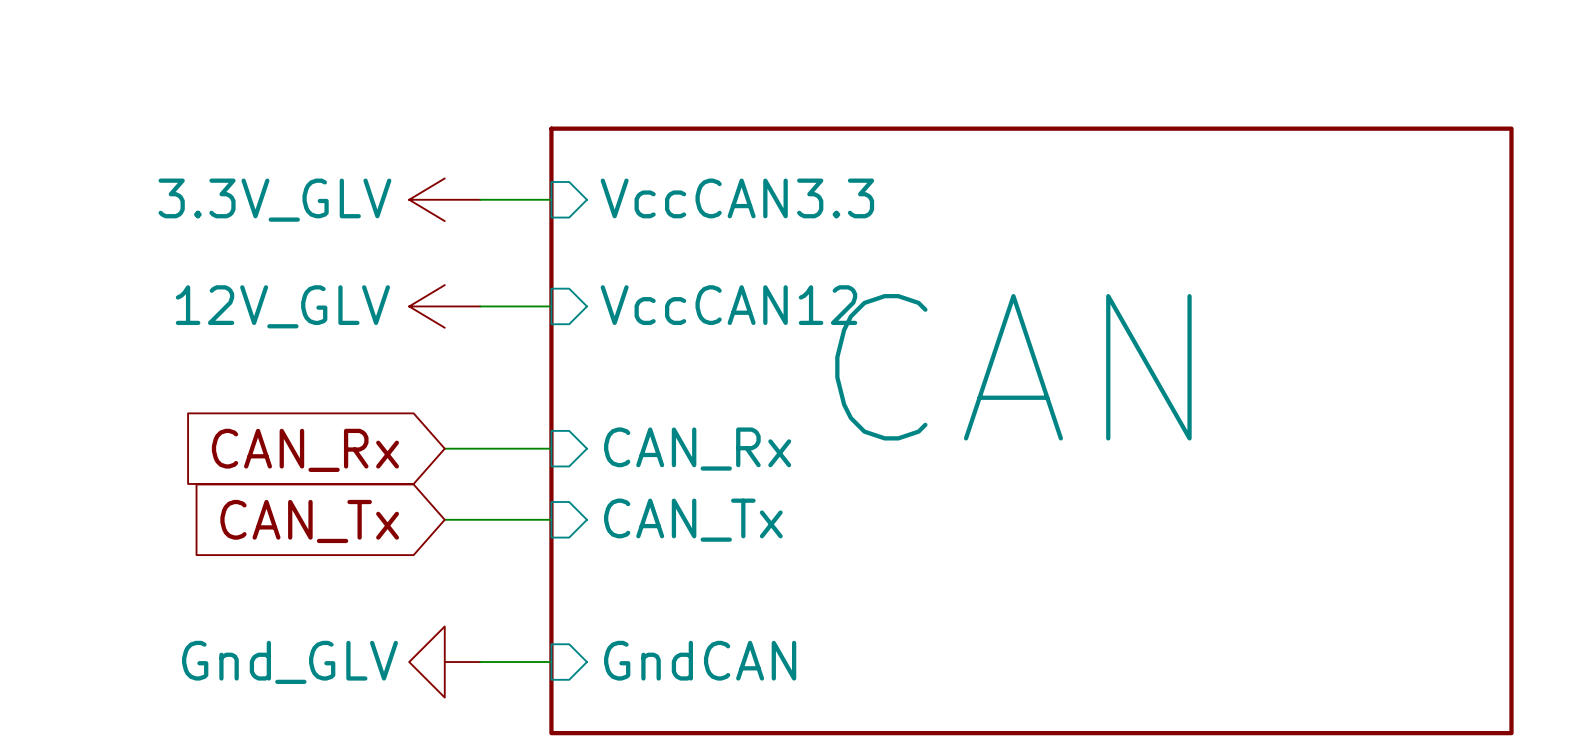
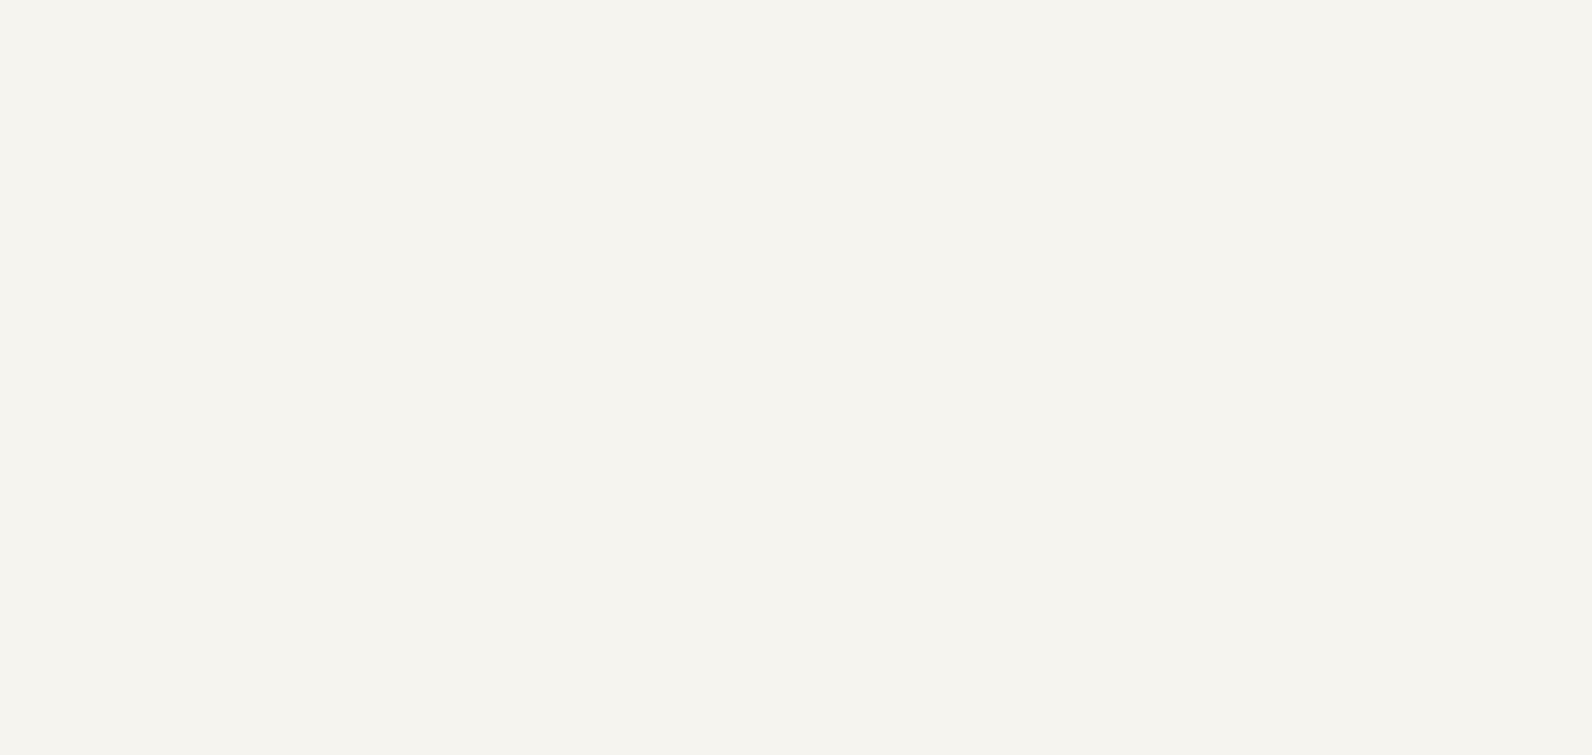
sheet pin: VccCAN3.3 (737, 198) -> none
power symbol: 3.3V_GLV (444, 199) -> none
wire: (480, 199) (551, 199) -> none
sheet pin: VccCAN12 (728, 305) -> none
power symbol: 12V_GLV (444, 306) -> none
wire: (480, 306) (551, 306) -> none
sheet CAN: (1031, 430) -> none
wire: (444, 448) (551, 448) -> none
sheet pin: CAN_Rx (697, 449) -> none
global label: CAN_Rx (305, 450) -> none
wire: (444, 519) (551, 519) -> none
sheet pin: CAN_Tx (693, 520) -> none
global label: CAN_Tx (309, 521) -> none
sheet pin: GndCAN (700, 660) -> none
power symbol: Gnd_GLV (444, 662) -> none
wire: (480, 662) (551, 662) -> none

